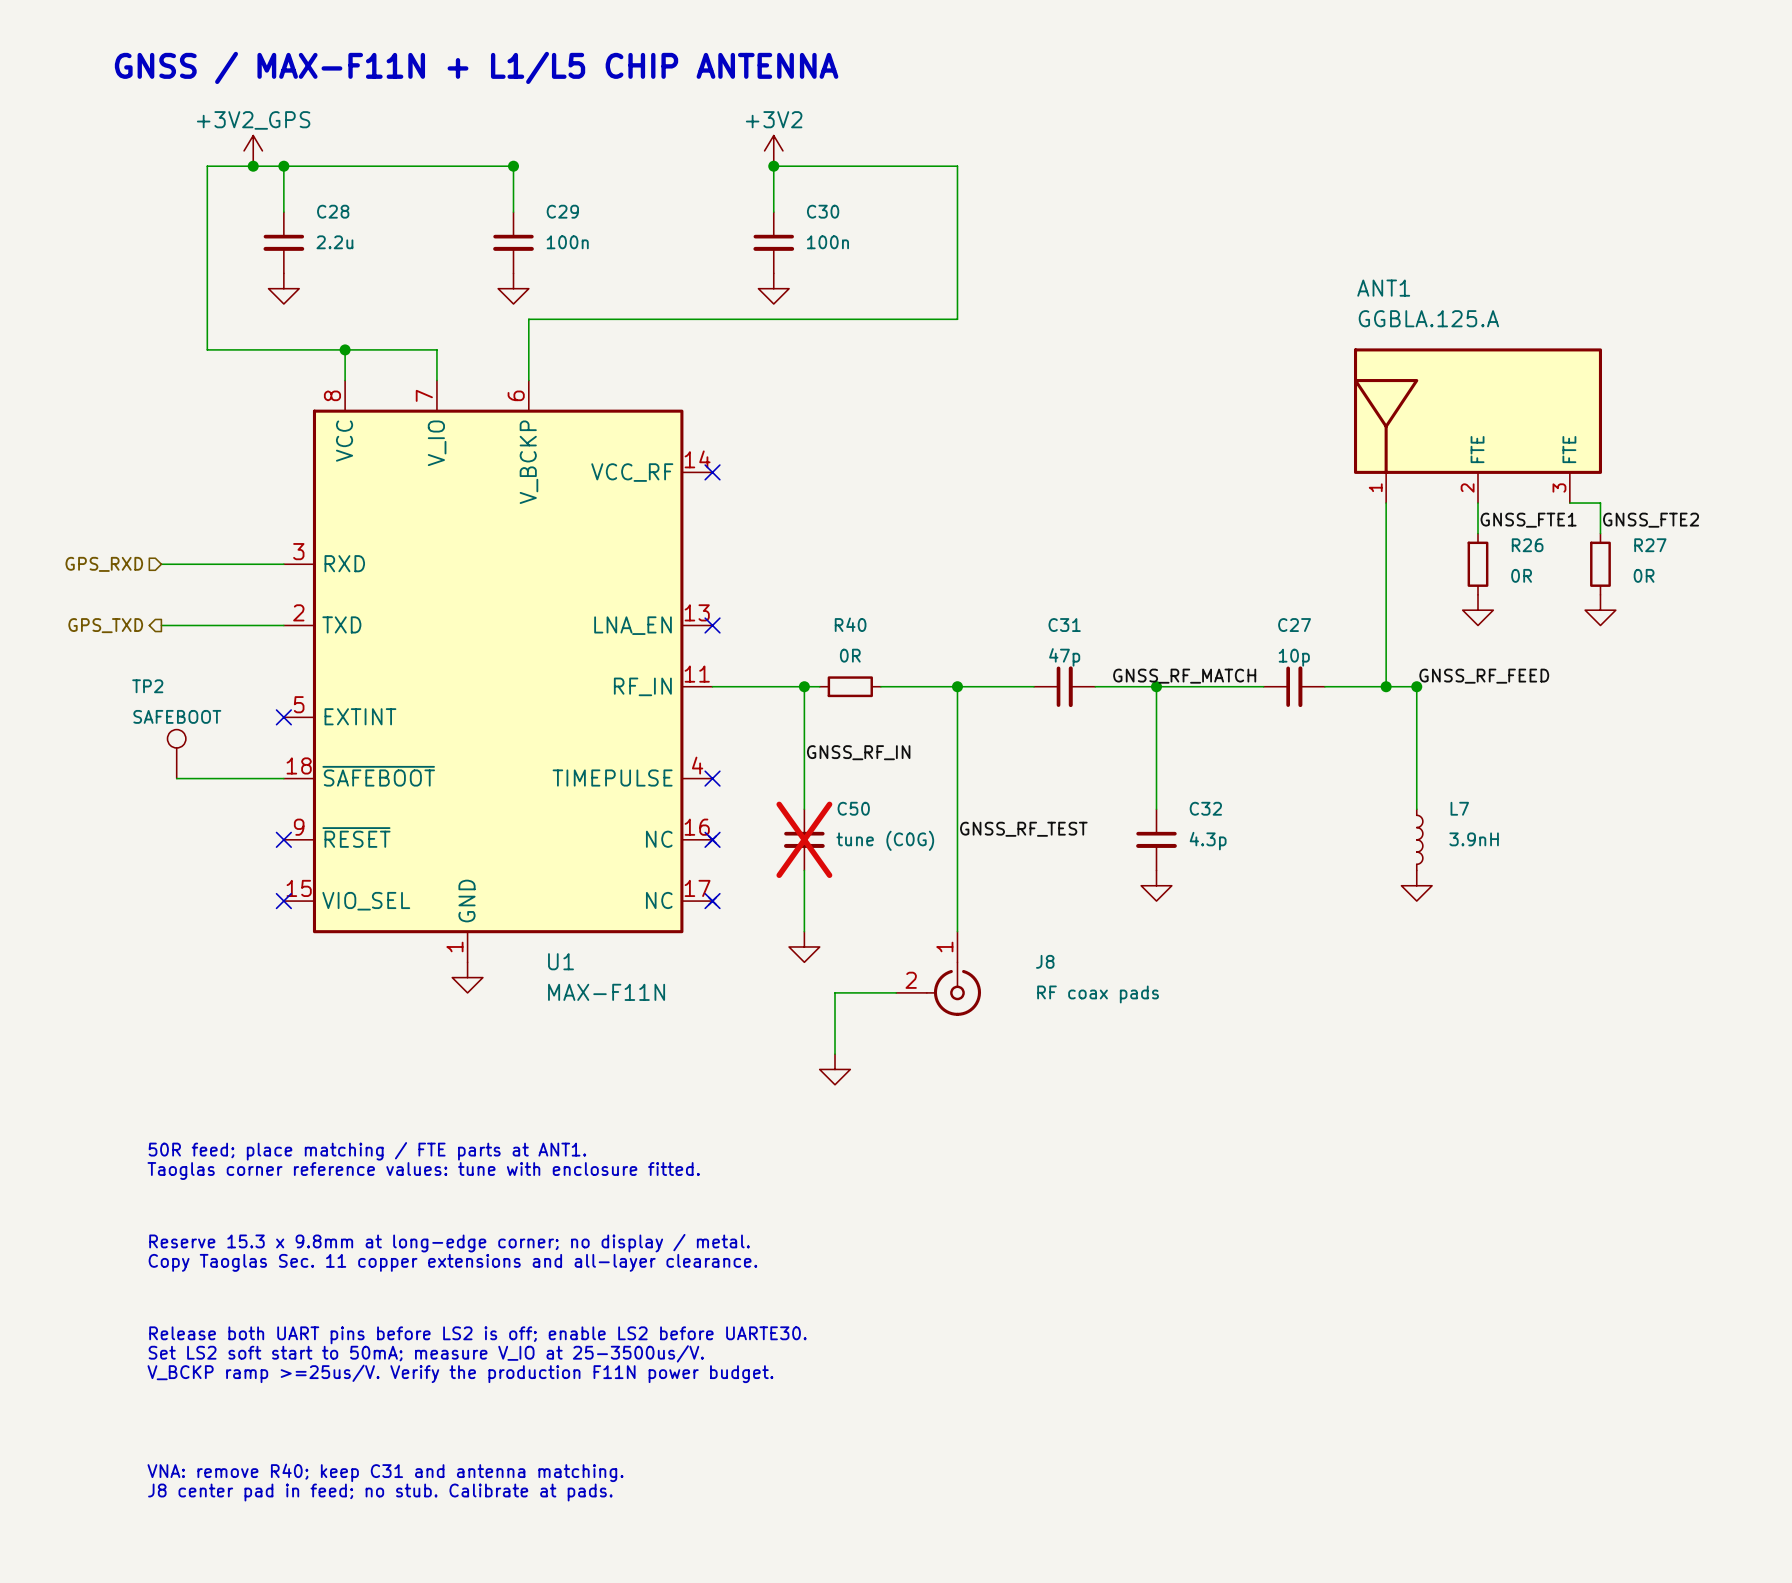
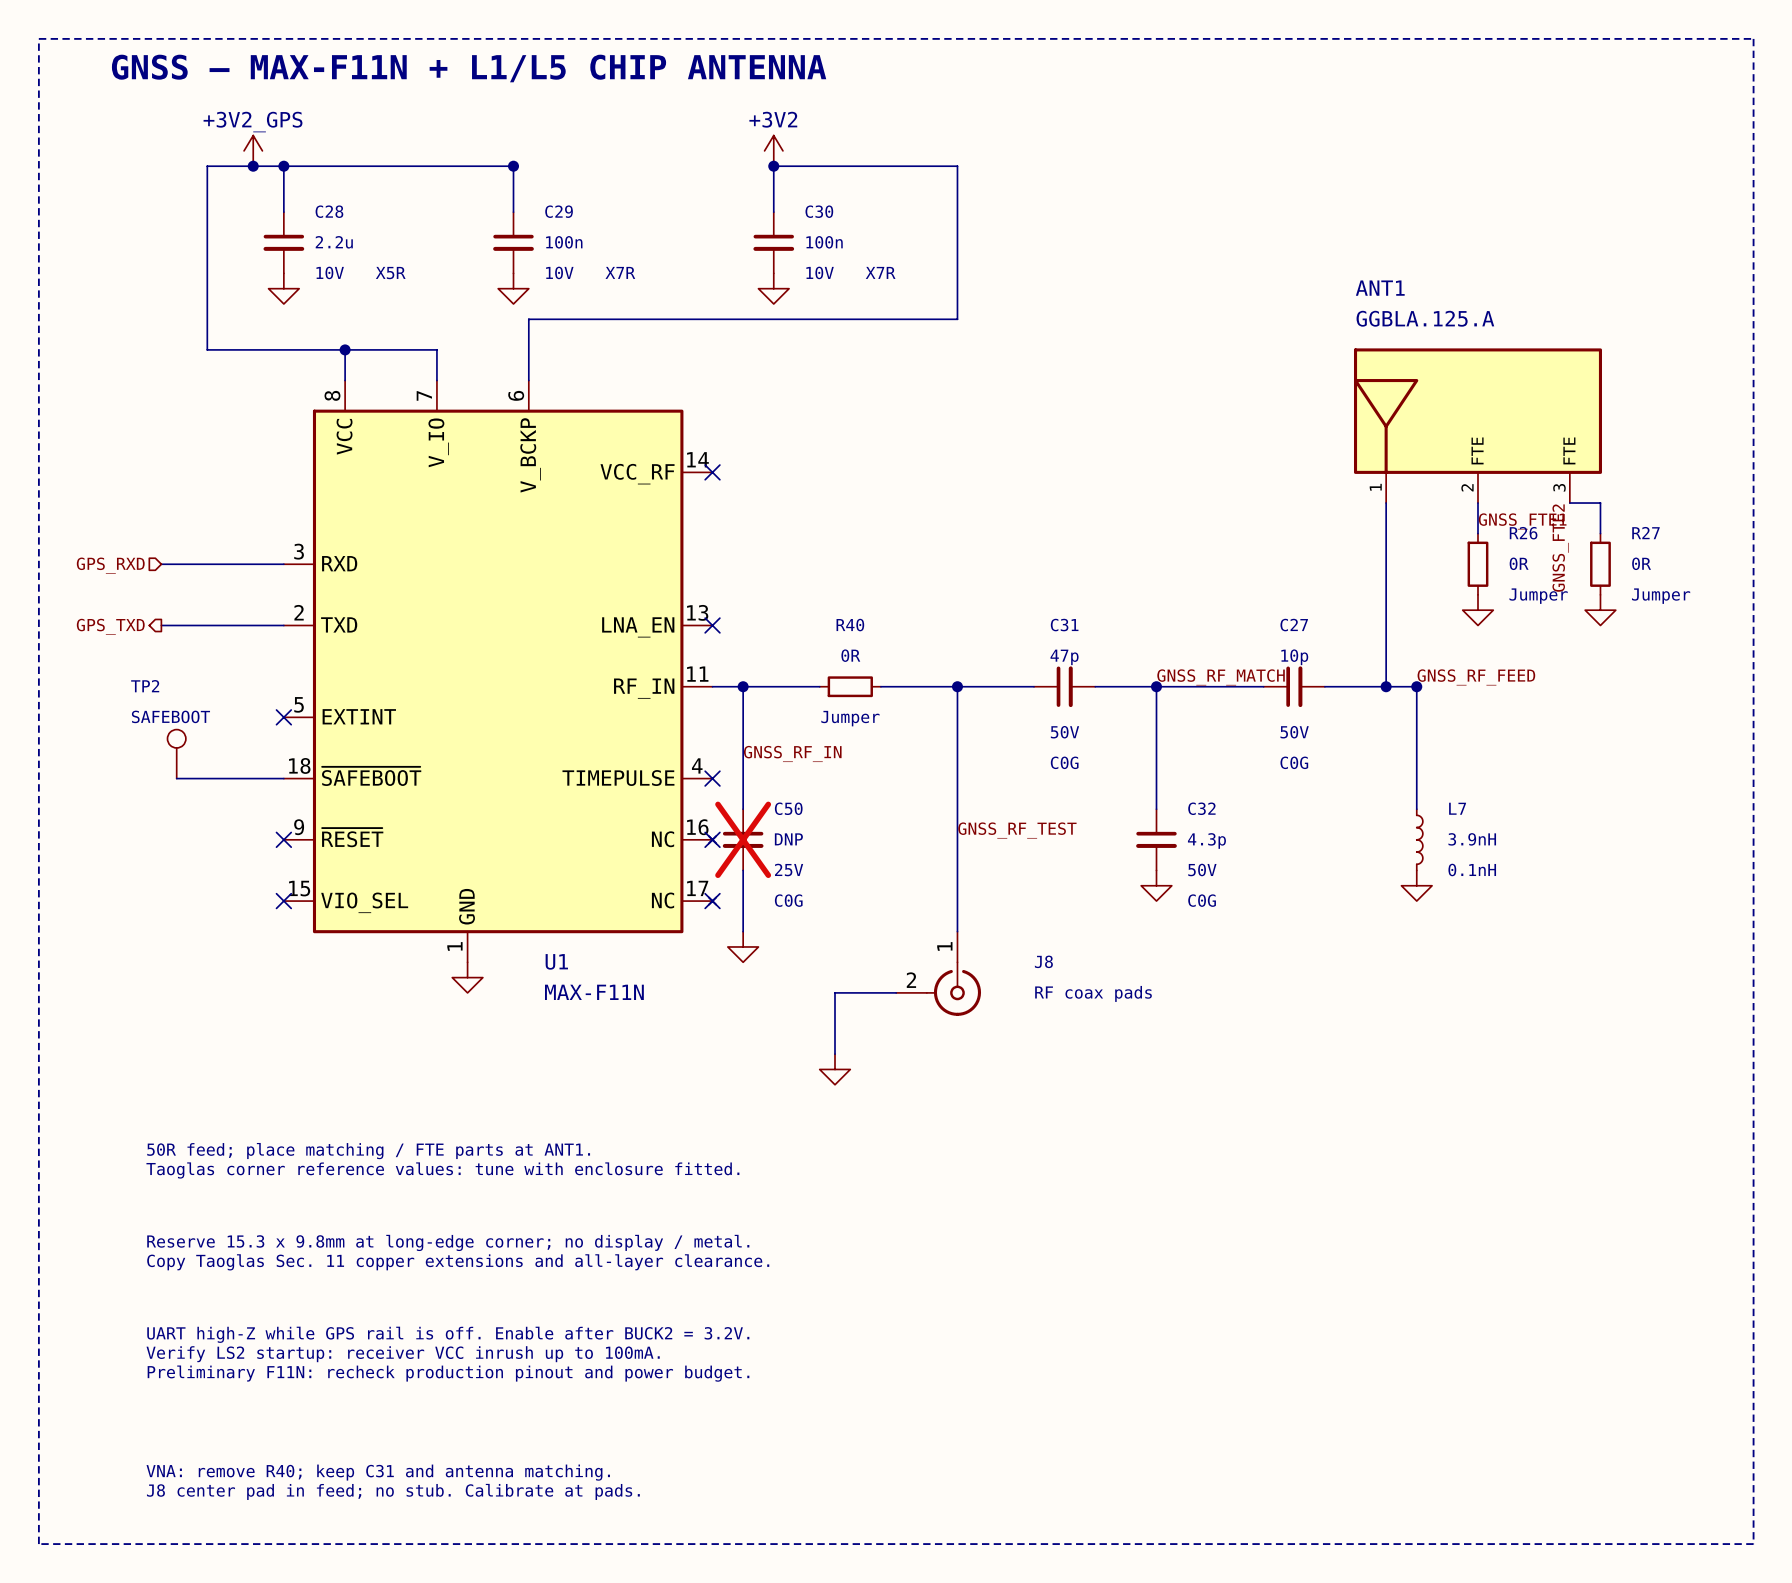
line: none -> (38, 38) (1753, 38) (1753, 1544) (38, 1544) (38, 38)
text: GNSS / MAX-F11N + L1/L5 CHIP ANTENNA (476, 67) -> GNSS — MAX-F11N + L1/L5 CHIP ANTENNA (469, 68)
C28 text: none -> 10V (330, 272)
C28 text: none -> X5R (390, 273)
C29 text: none -> 10V (559, 272)
C29 text: none -> X7R (620, 272)
C30 text: none -> 10V (820, 272)
C30 text: none -> X7R (880, 272)
label rotation: 0° (1651, 520) -> 90° counterclockwise (1560, 548)
R26 name position: R26 (1527, 545) -> R26 (1523, 533)
R27 name position: R27 (1650, 545) -> R27 (1645, 533)
R26 value position: 0R (1521, 575) -> 0R (1519, 563)
R27 value position: 0R (1644, 575) -> 0R (1641, 563)
R26 text: none -> Jumper (1538, 596)
R27 text: none -> Jumper (1661, 596)
label position: GNSS_RF_MATCH (1184, 676) -> GNSS_RF_MATCH (1221, 677)
wire: (804, 686) (804, 809) -> (743, 686) (743, 809)
junction position: (804, 686) -> (743, 686)
R40 text: none -> Jumper (850, 718)
C31 text: none -> 50V (1064, 732)
C27 text: none -> 50V (1294, 732)
label position: GNSS_RF_IN (858, 752) -> GNSS_RF_IN (792, 753)
C31 text: none -> C0G (1064, 762)
C27 text: none -> C0G (1294, 762)
C50 position: (804, 839) -> (743, 839)
C50 value: tune (C0G) (885, 840) -> DNP (788, 839)
C50 text: none -> 25V (789, 870)
C32 text: none -> 50V (1202, 870)
L7 text: none -> 0.1nH (1472, 870)
wire: (804, 870) (804, 931) -> (743, 870) (743, 931)
C50 text: none -> C0G (788, 900)
C32 text: none -> C0G (1202, 900)
power symbol position: (804, 946) -> (743, 946)
text: Release both UART pins before LS2 is off; enable LS2 before UARTE30. (477, 1335) -> UART high-Z while GPS rail is off. Enable after BUCK2 = 3.2V. (448, 1334)
text: Set LS2 soft start to 50mA; measure V_IO at 25-3500us/V. (426, 1353) -> Verify LS2 startup: receiver VCC inrush up to 100mA. (403, 1354)
text: V_BCKP ramp >=25us/V. Verify the production F11N power budget. (460, 1373) -> Preliminary F11N: recheck production pinout and power budget. (448, 1373)

